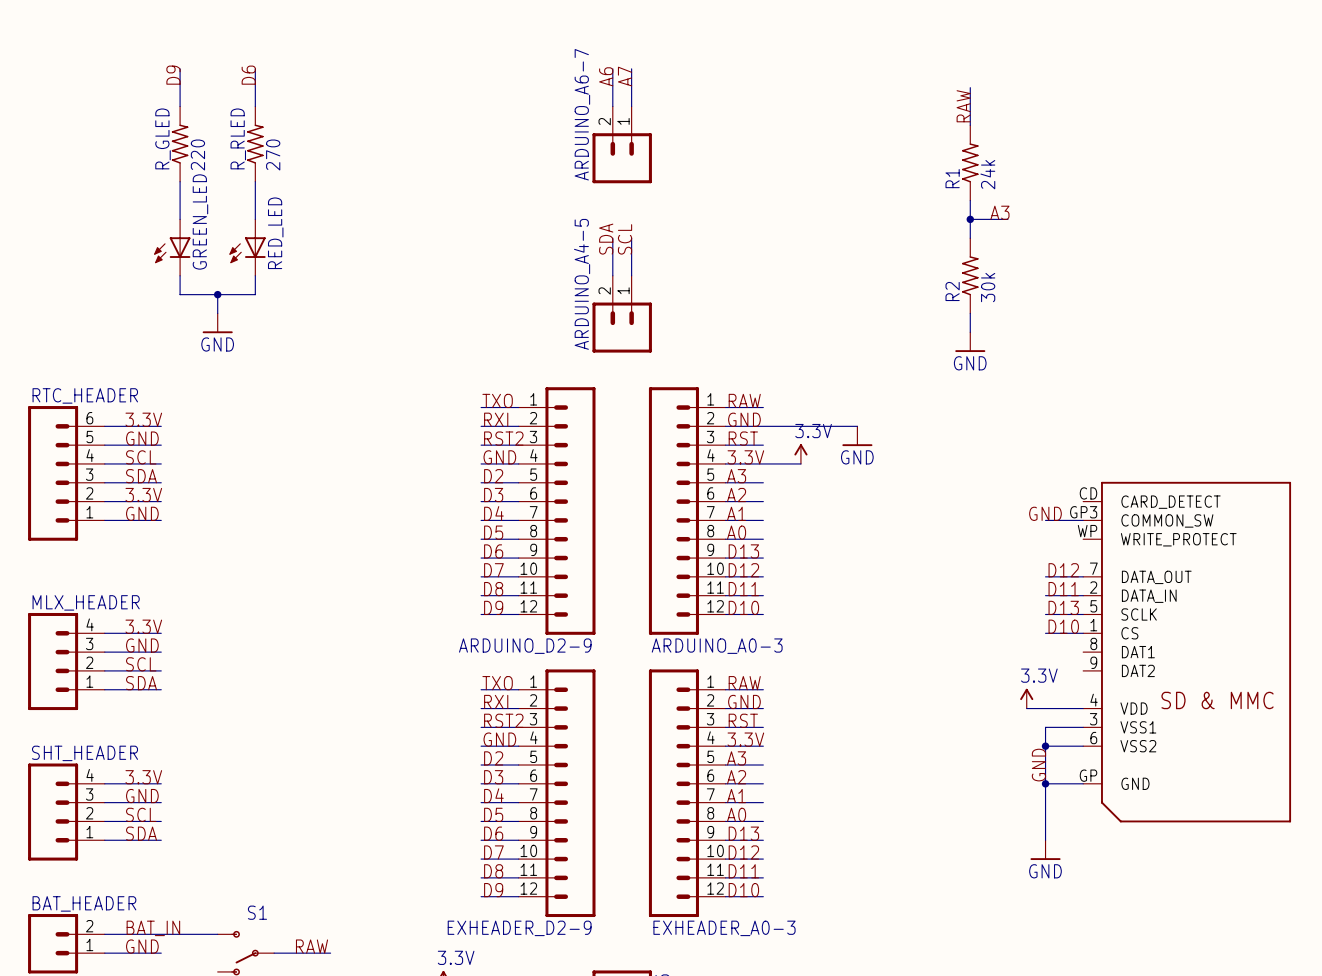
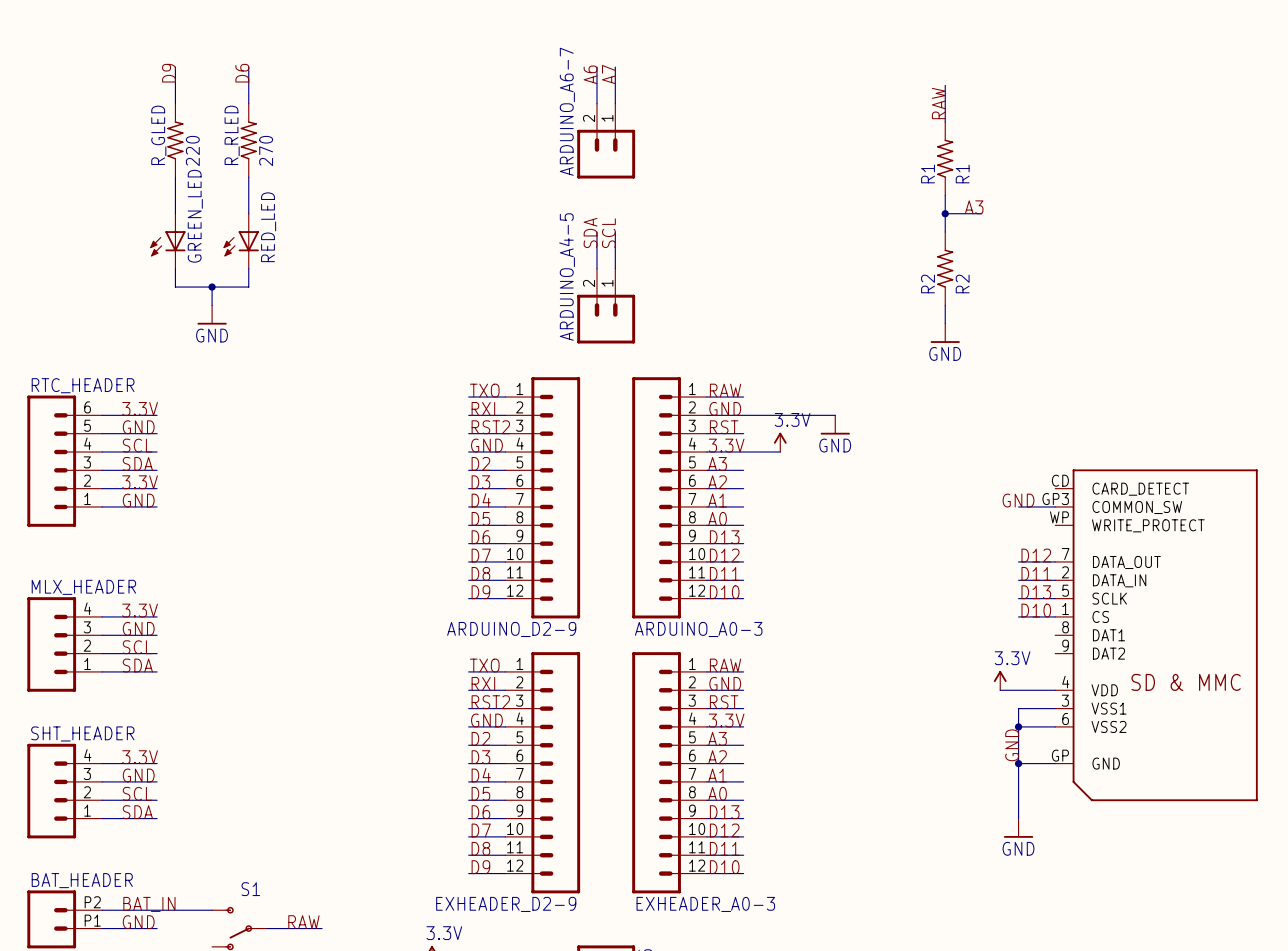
R1 value: 24k (987, 174) -> R1 (962, 174)
R2 value: 30k (988, 287) -> R2 (962, 283)
BAT_HEADER pin number: 2 (89, 926) -> P2 (92, 902)
BAT_HEADER pin number: 1 (89, 945) -> P1 (92, 920)

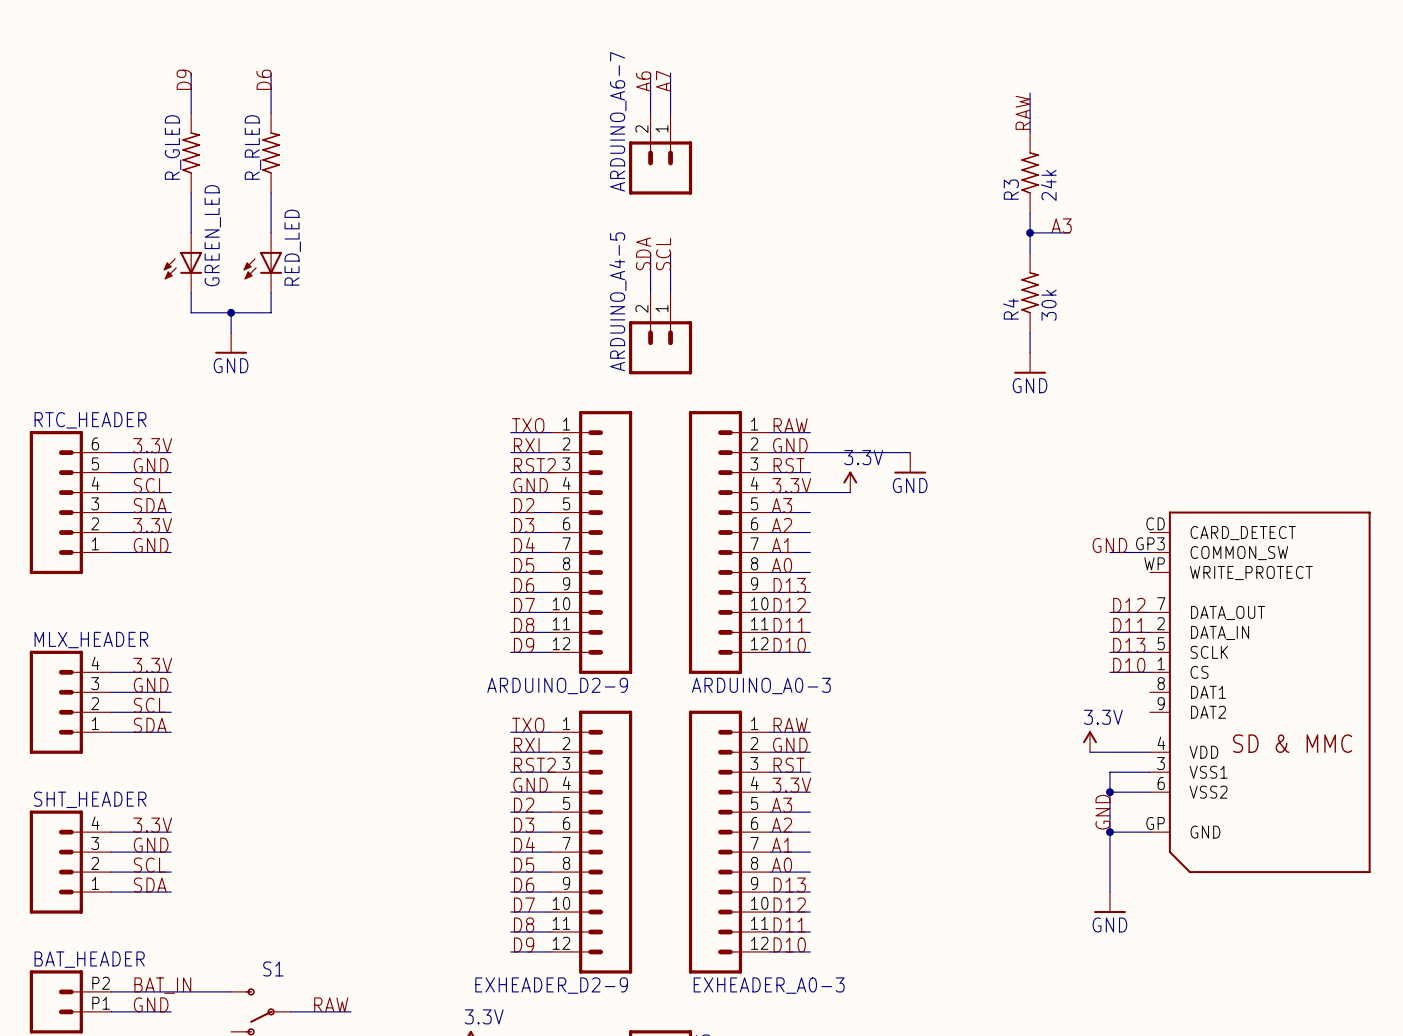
R_GLED value: 220 (192, 151) -> none
R_RLED value: 270 (266, 151) -> none
R1 name: R1 (928, 174) -> R3 (1011, 189)
R1 value: R1 (962, 174) -> 24k (1048, 185)
R2 name: R2 (928, 283) -> R4 (1010, 309)
R2 value: R2 (962, 283) -> 30k (1049, 305)

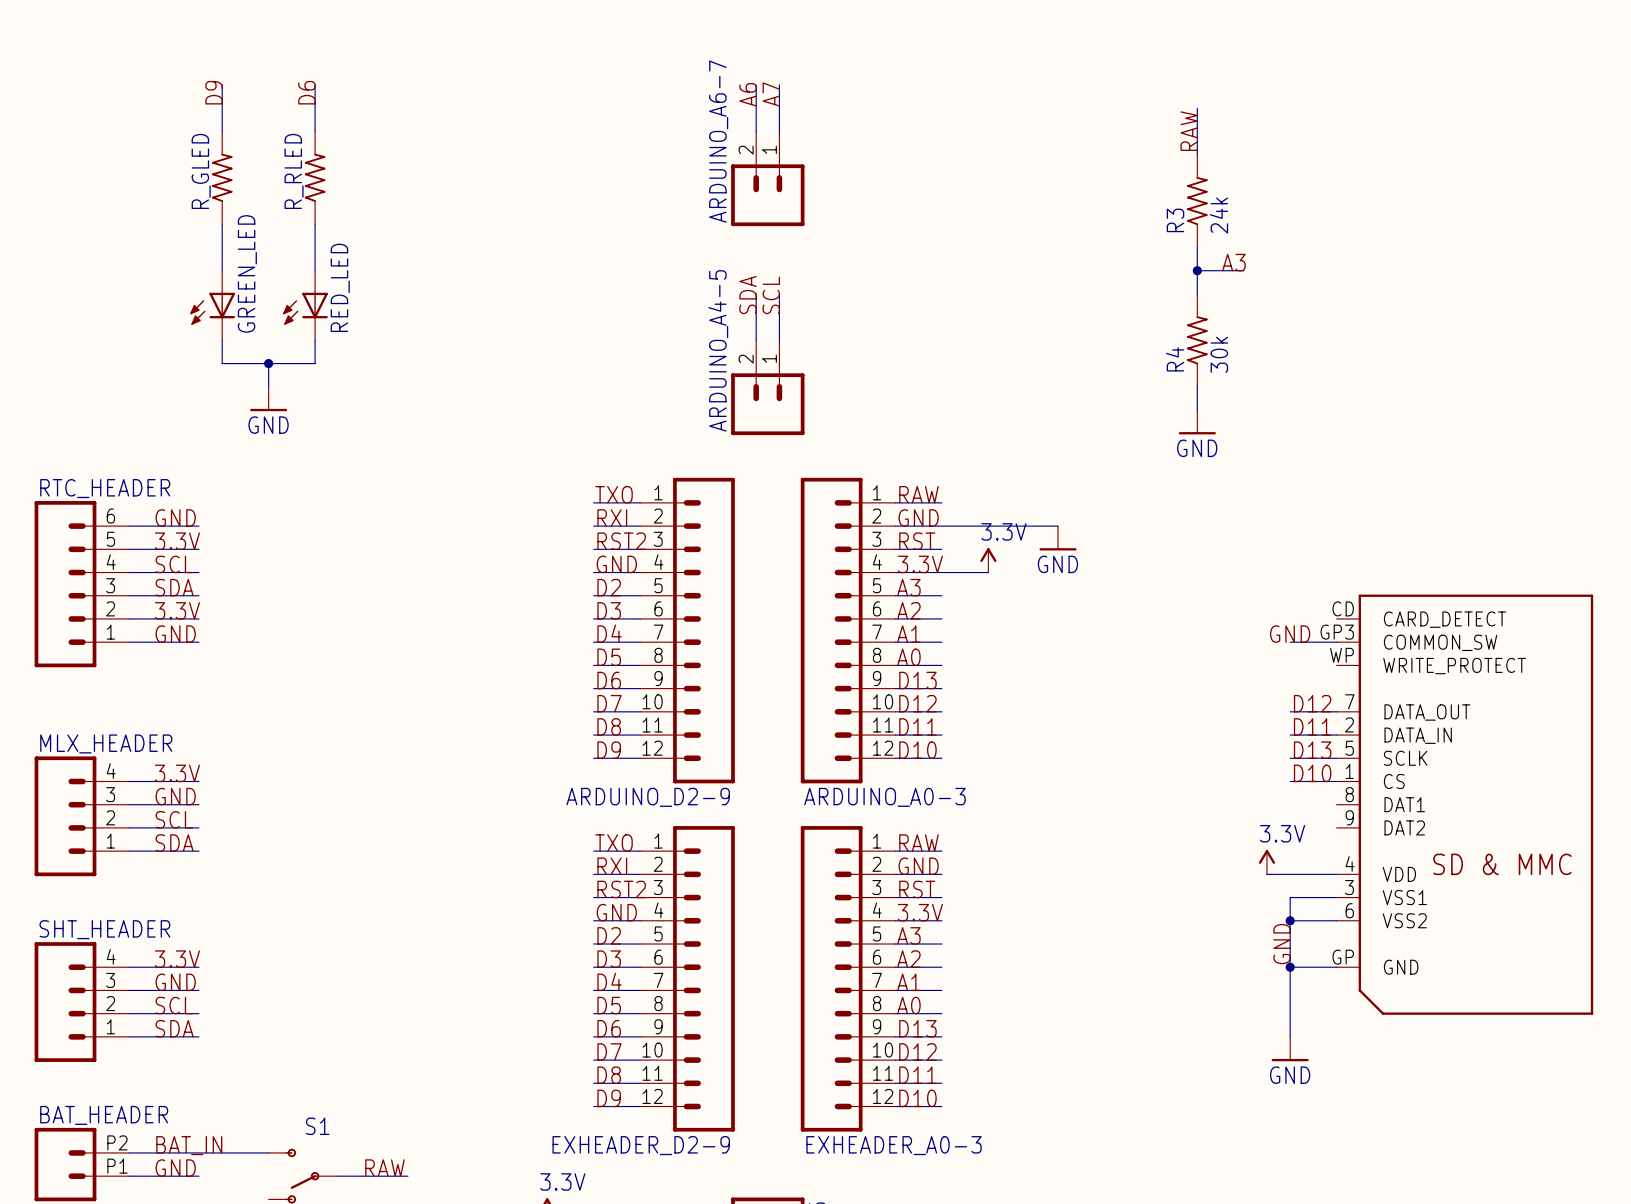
label: 3.3V (152, 445) -> GND (175, 517)
label: GND (151, 465) -> 3.3V (177, 541)

